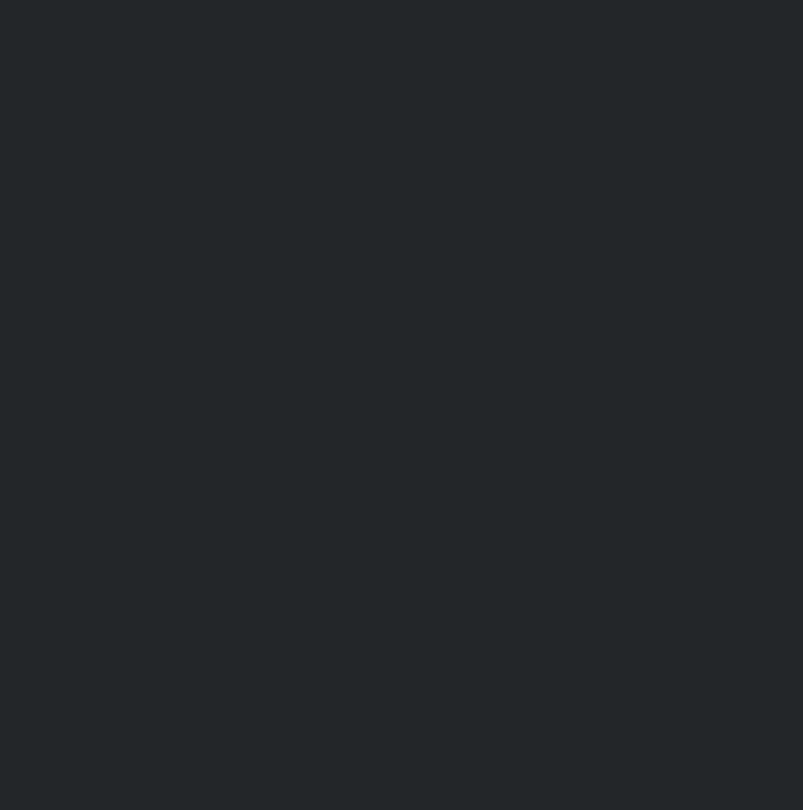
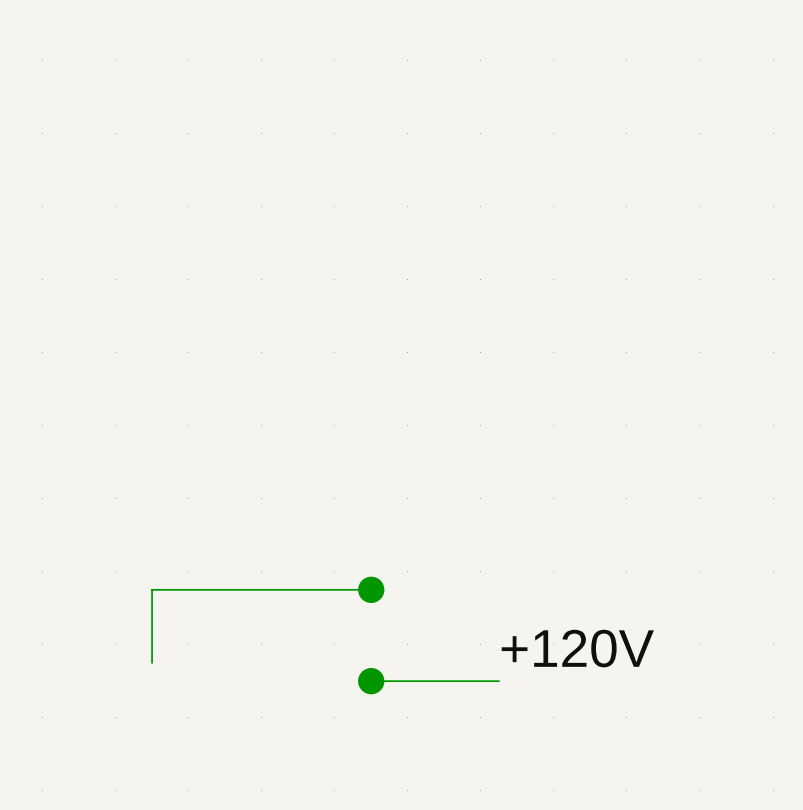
wire: none -> (371, 589) (152, 589) (152, 662)
junction: none -> (371, 589)
label: none -> +120V (577, 648)
wire: none -> (371, 681) (499, 681)
junction: none -> (371, 681)

